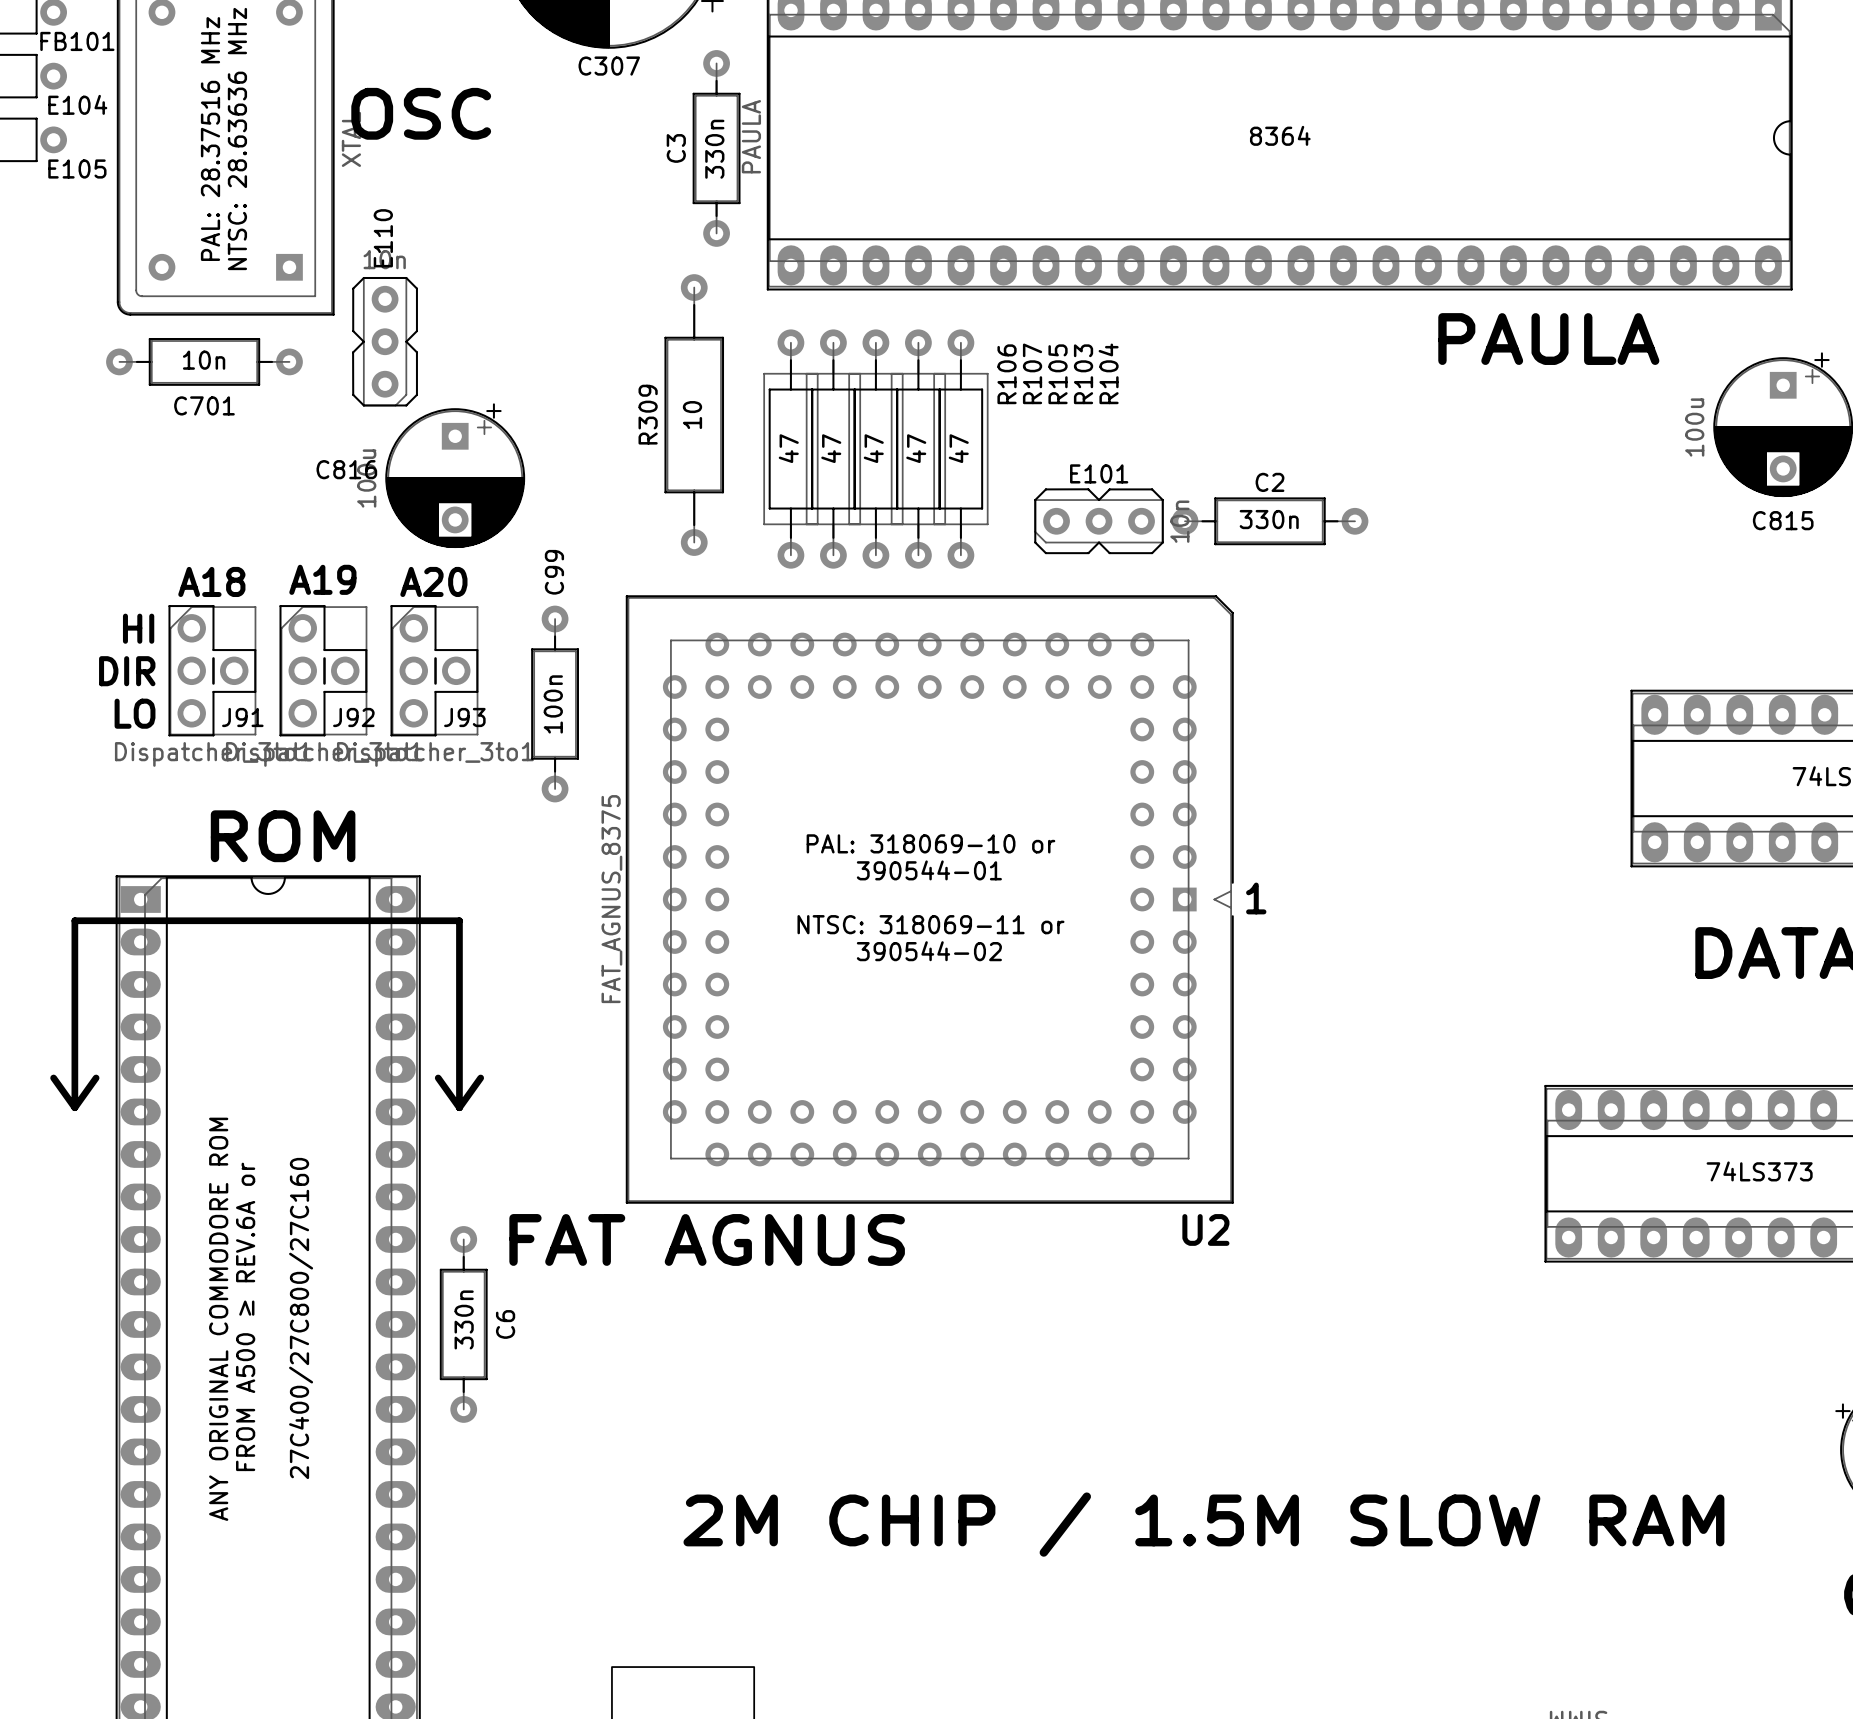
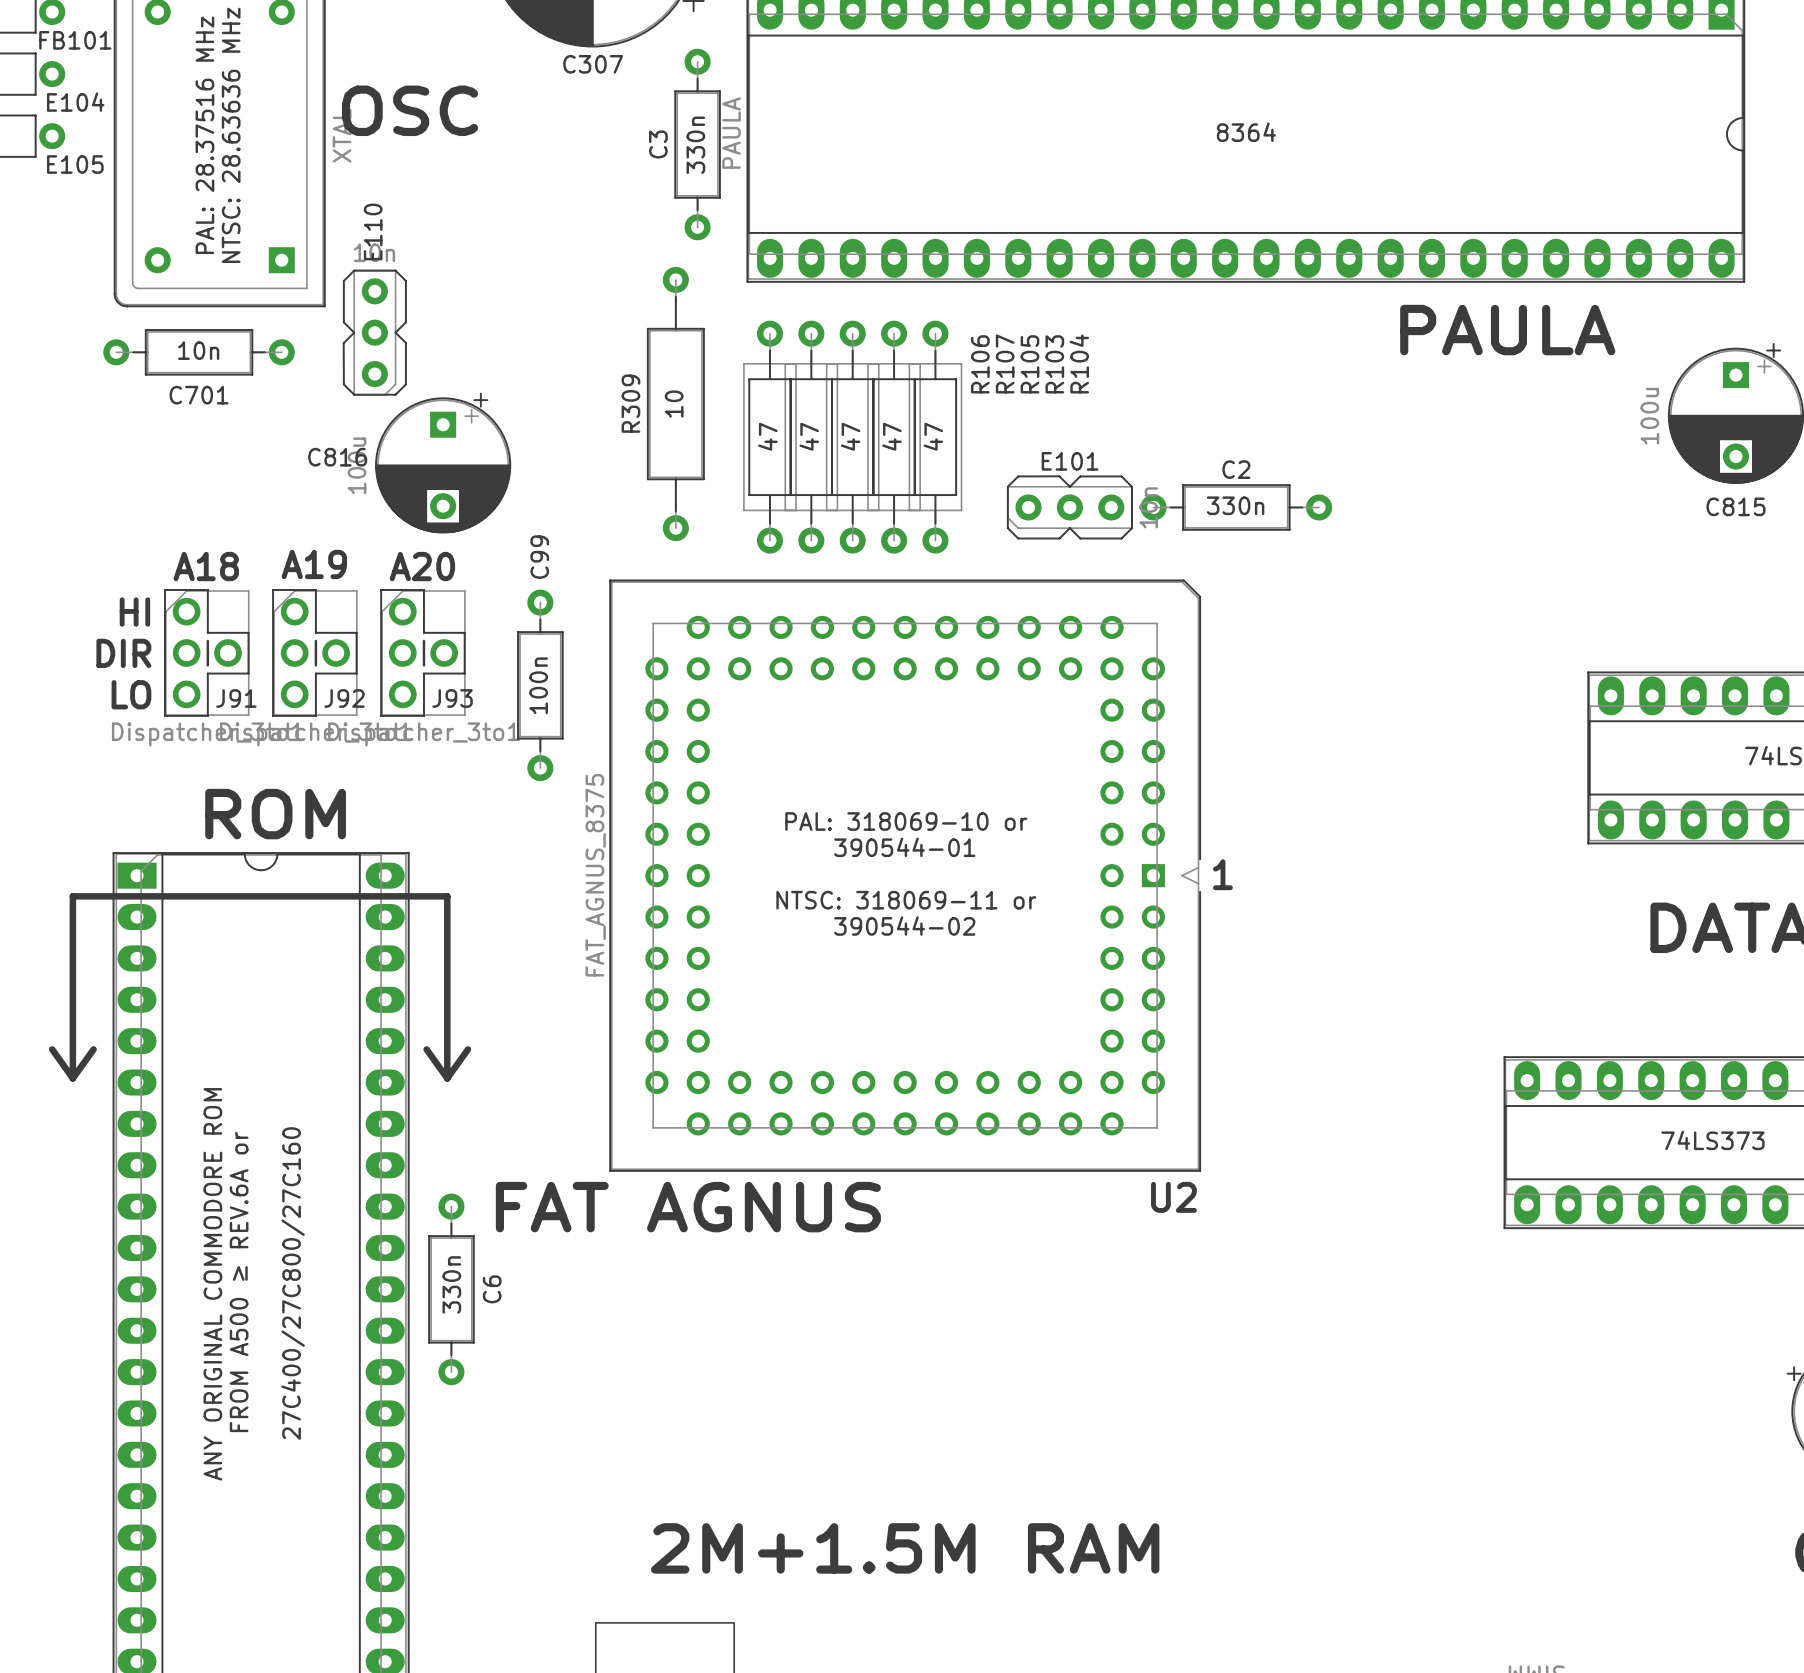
text: 2M CHIP / 1.5M SLOW RAM (1203, 1524) -> none
text: none -> 2M+1.5M RAM (905, 1548)

